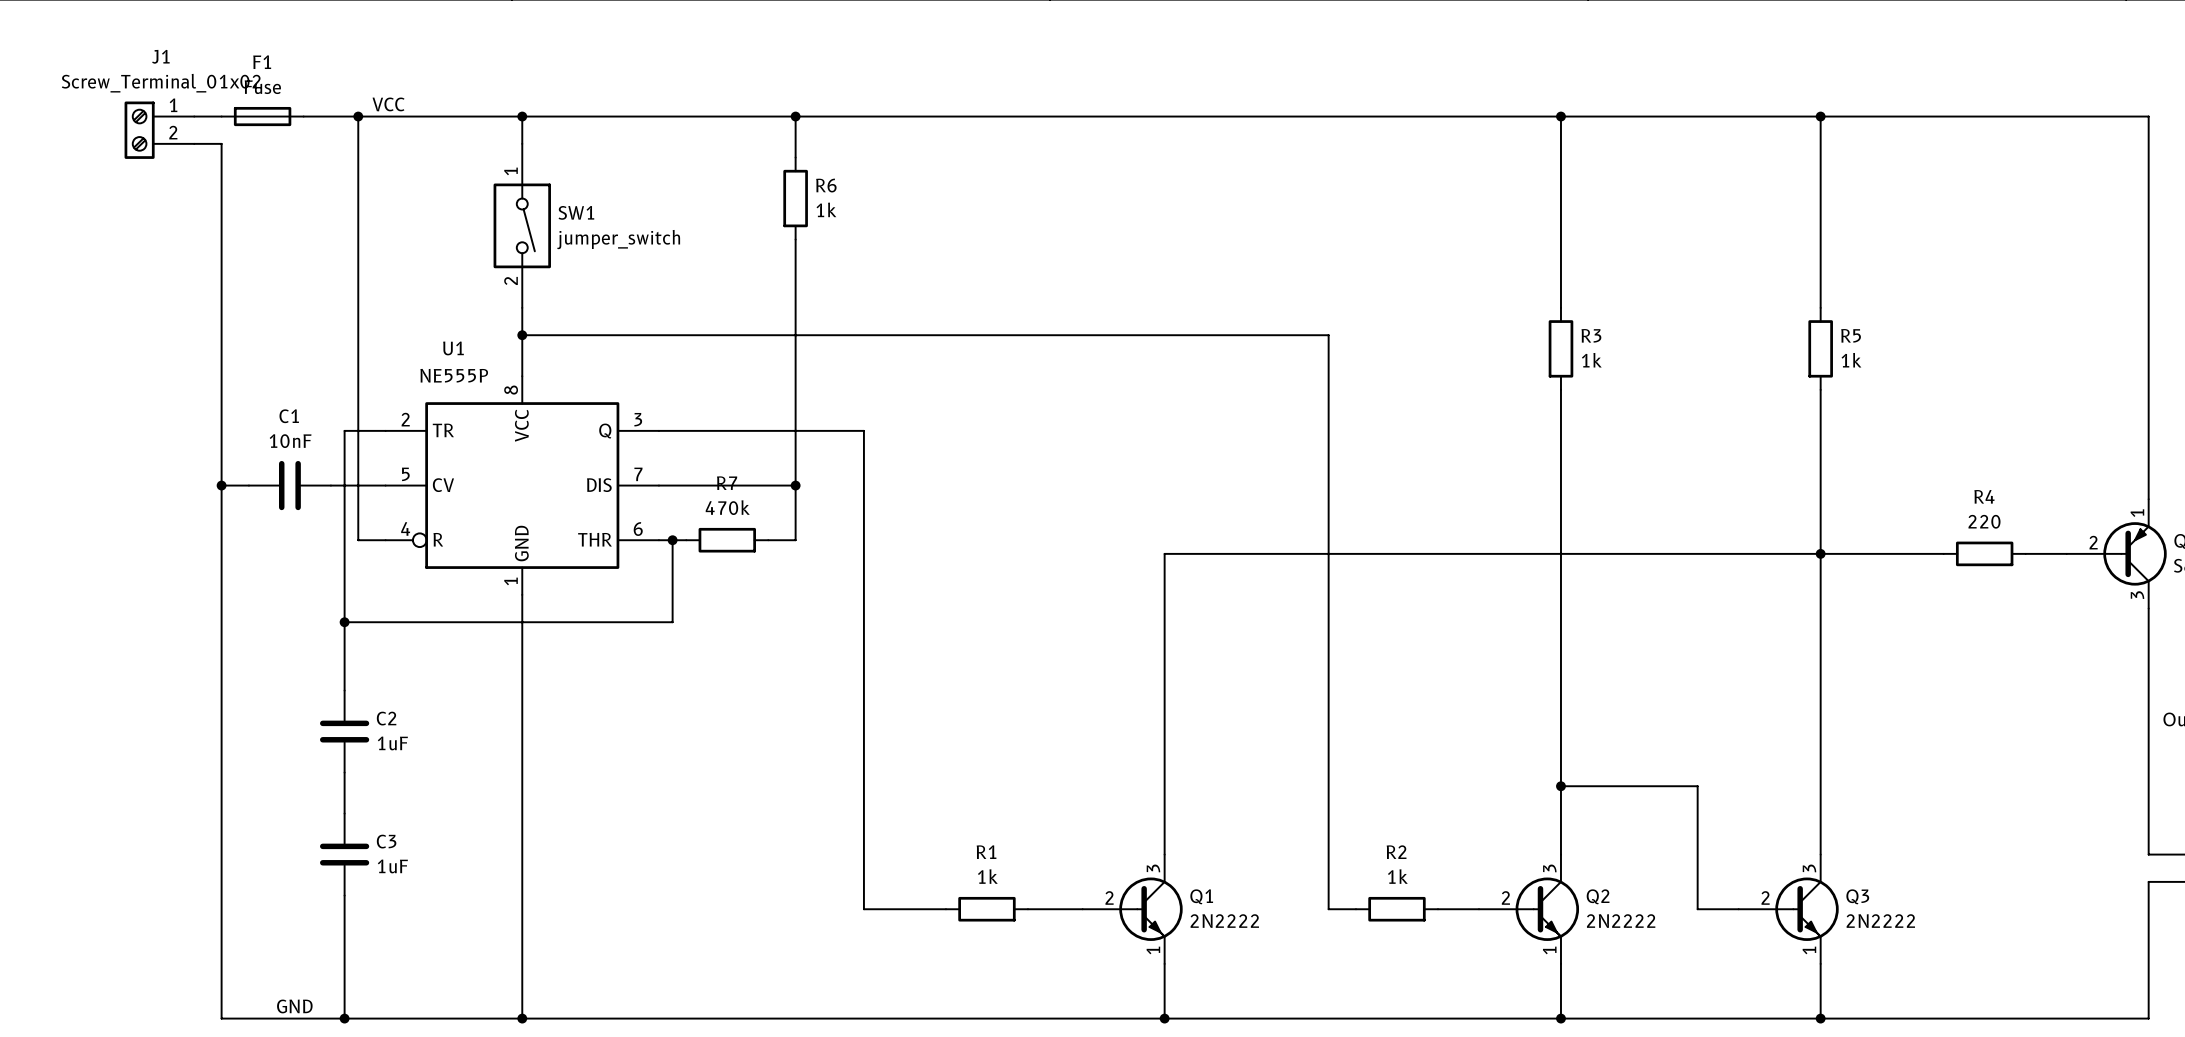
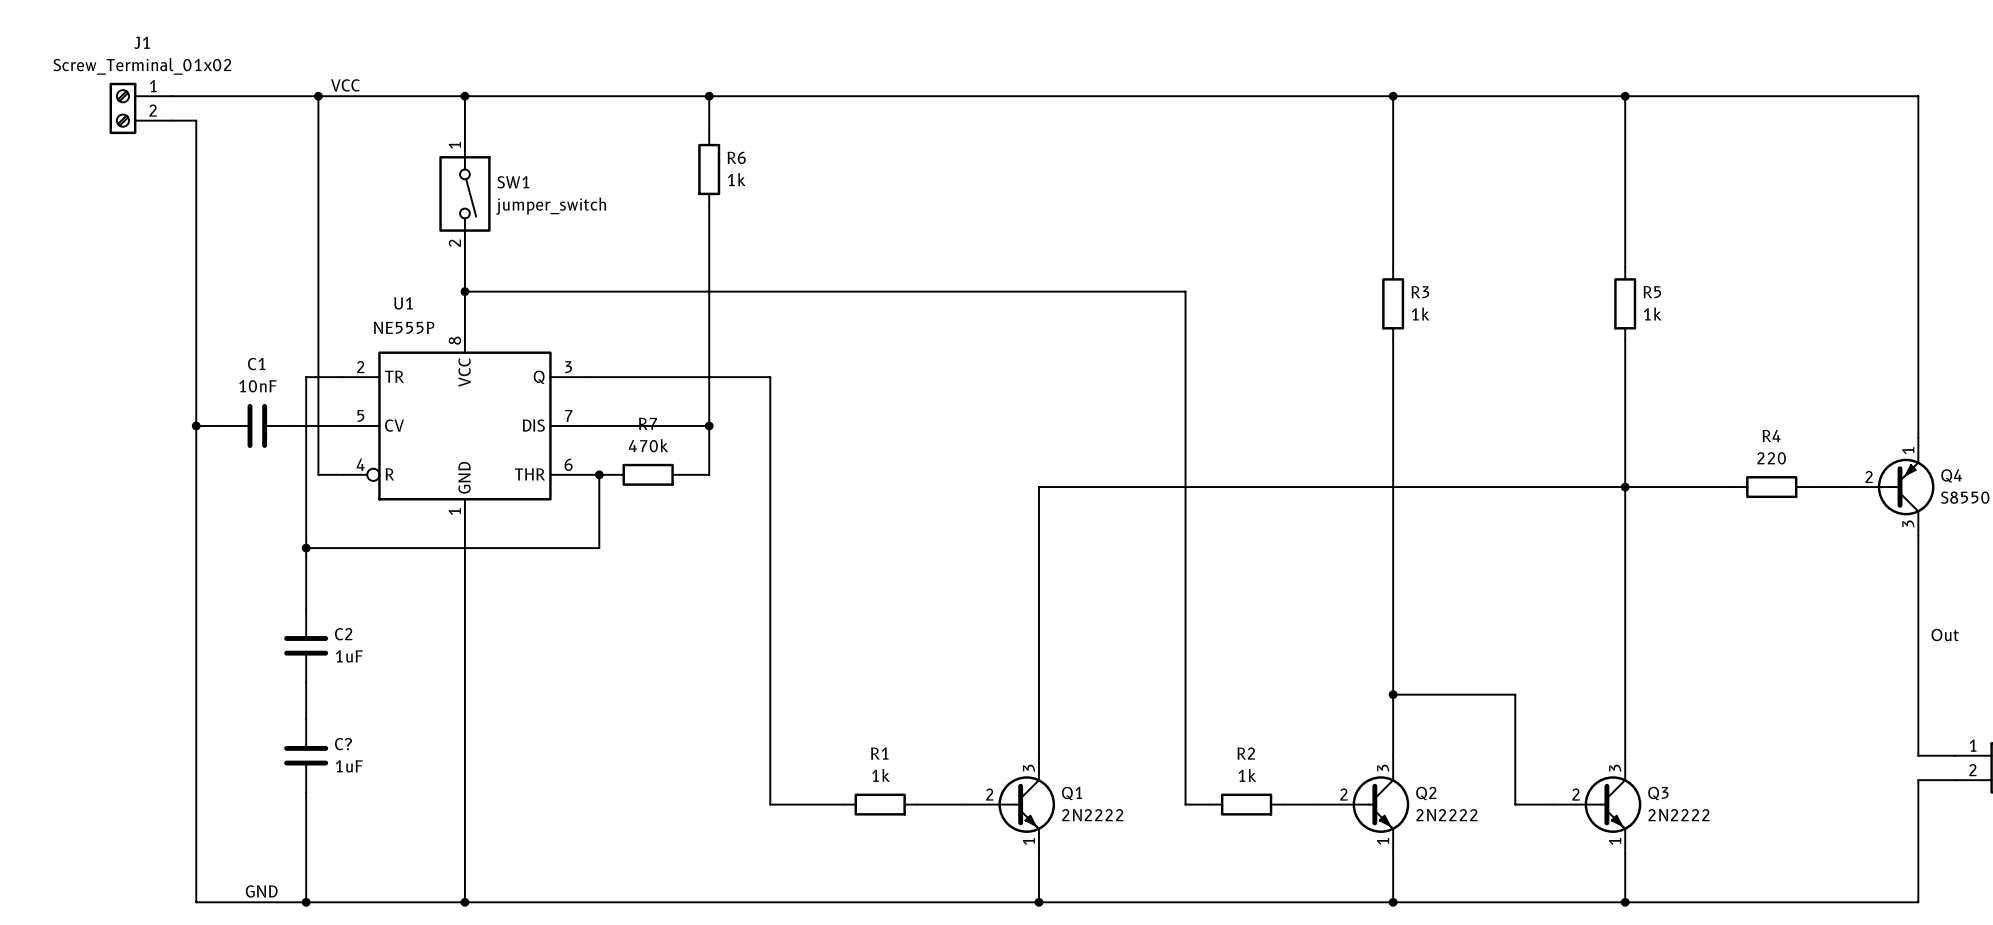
F1: Fuse (262, 116) -> none
C3 name: C3 (386, 841) -> C? (343, 744)

